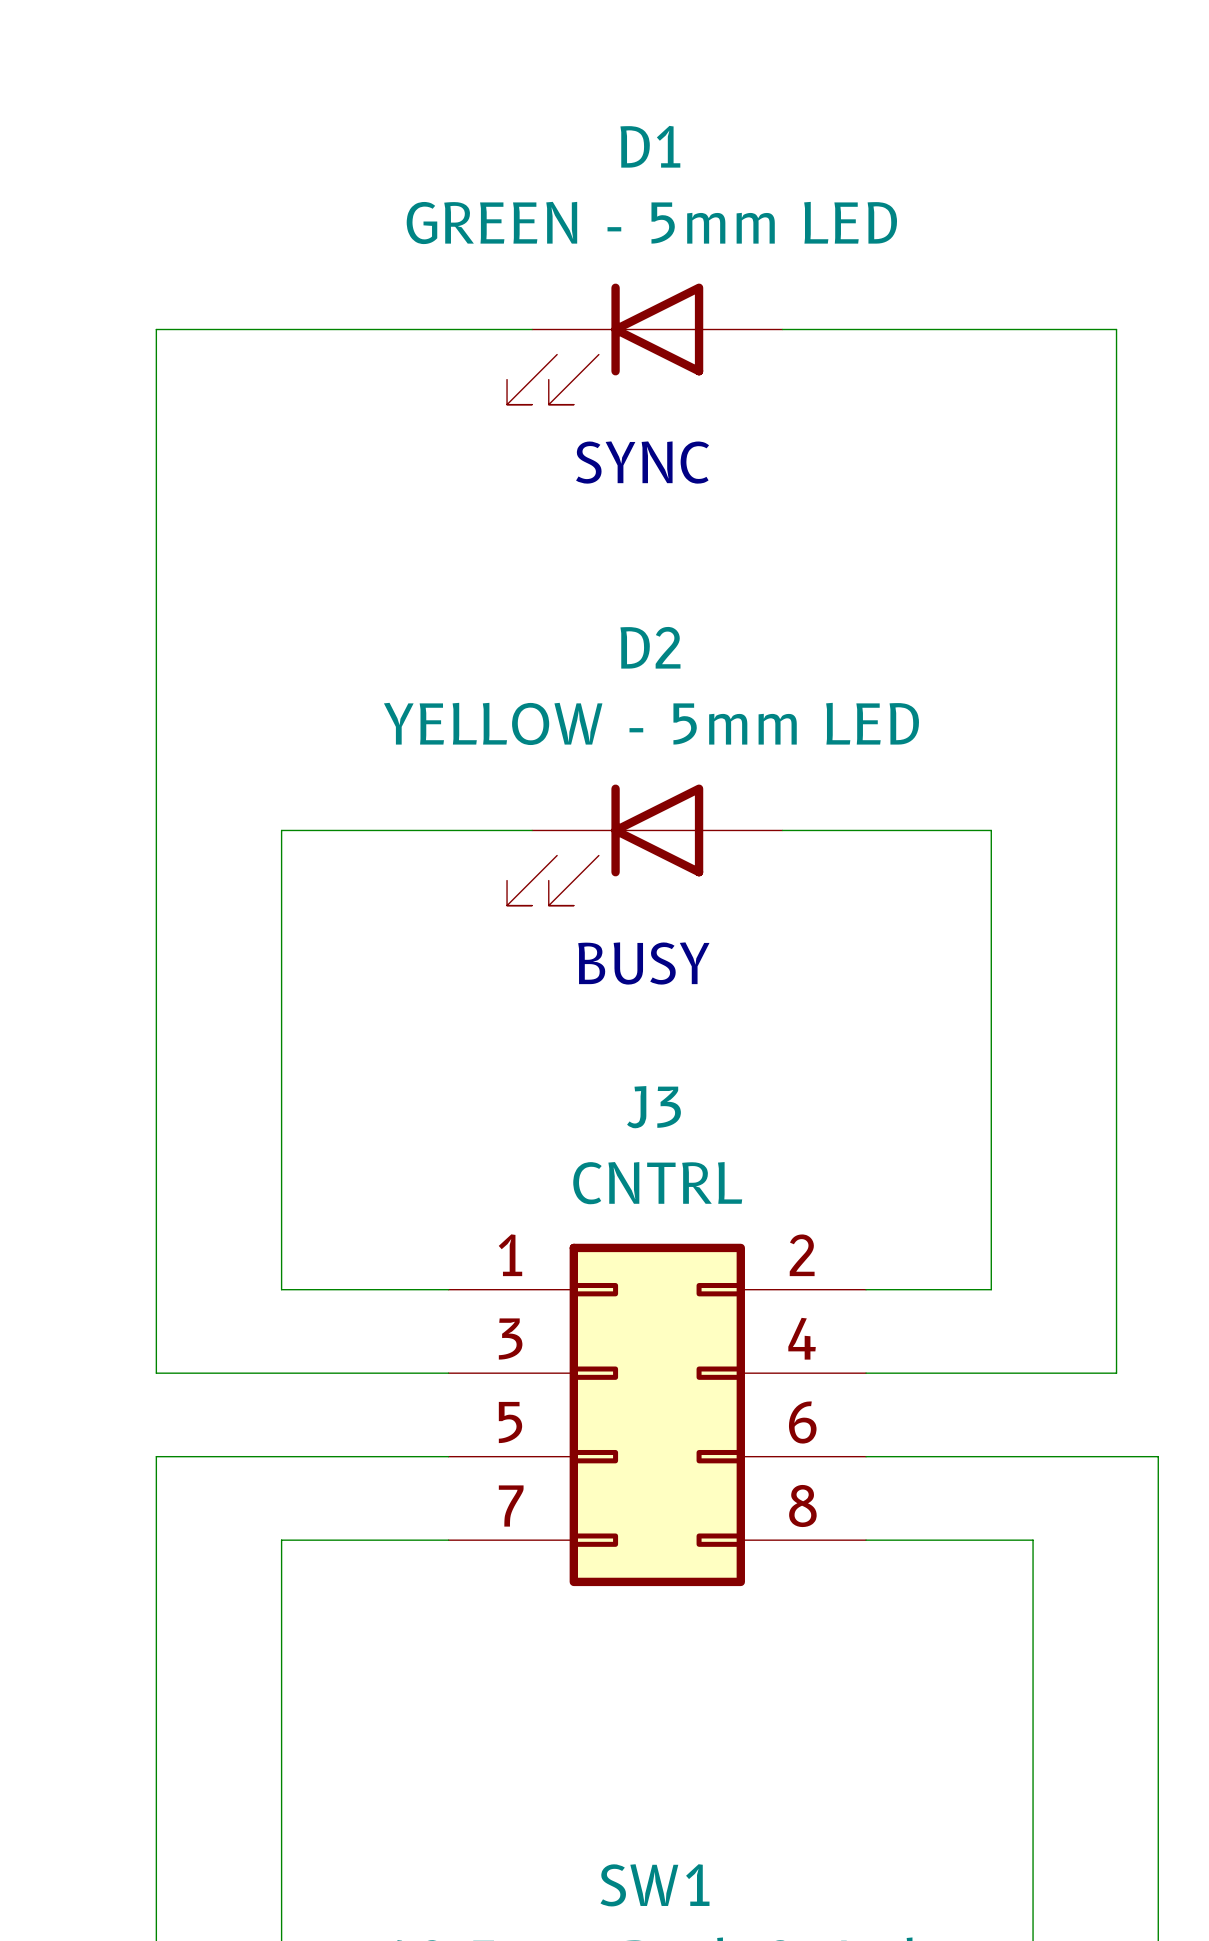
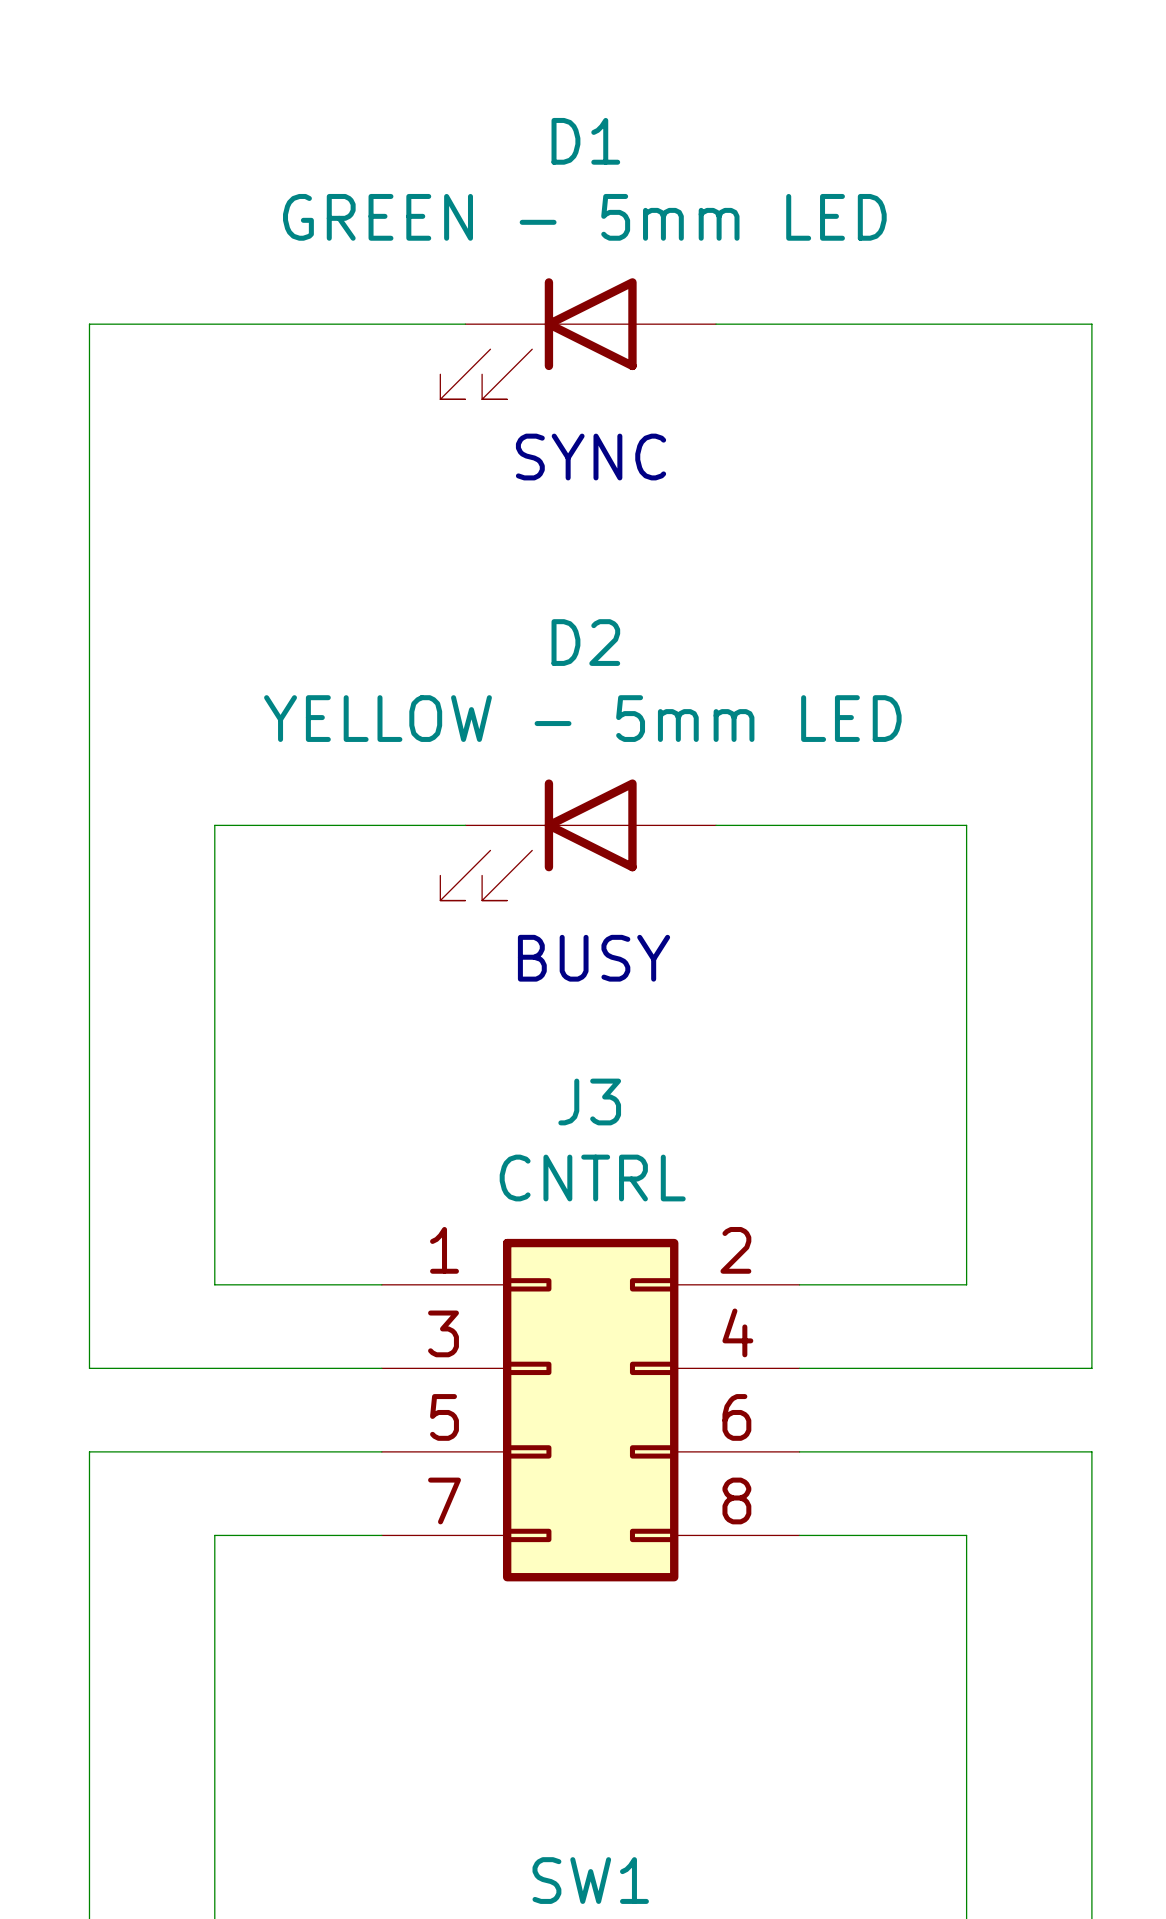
wire: (1116, 329) (1116, 1373) -> (1050, 324) (1091, 324) (1091, 1368) (1050, 1368)
wire: (991, 830) (991, 1289) -> (924, 825) (966, 825) (966, 1284) (924, 1284)

